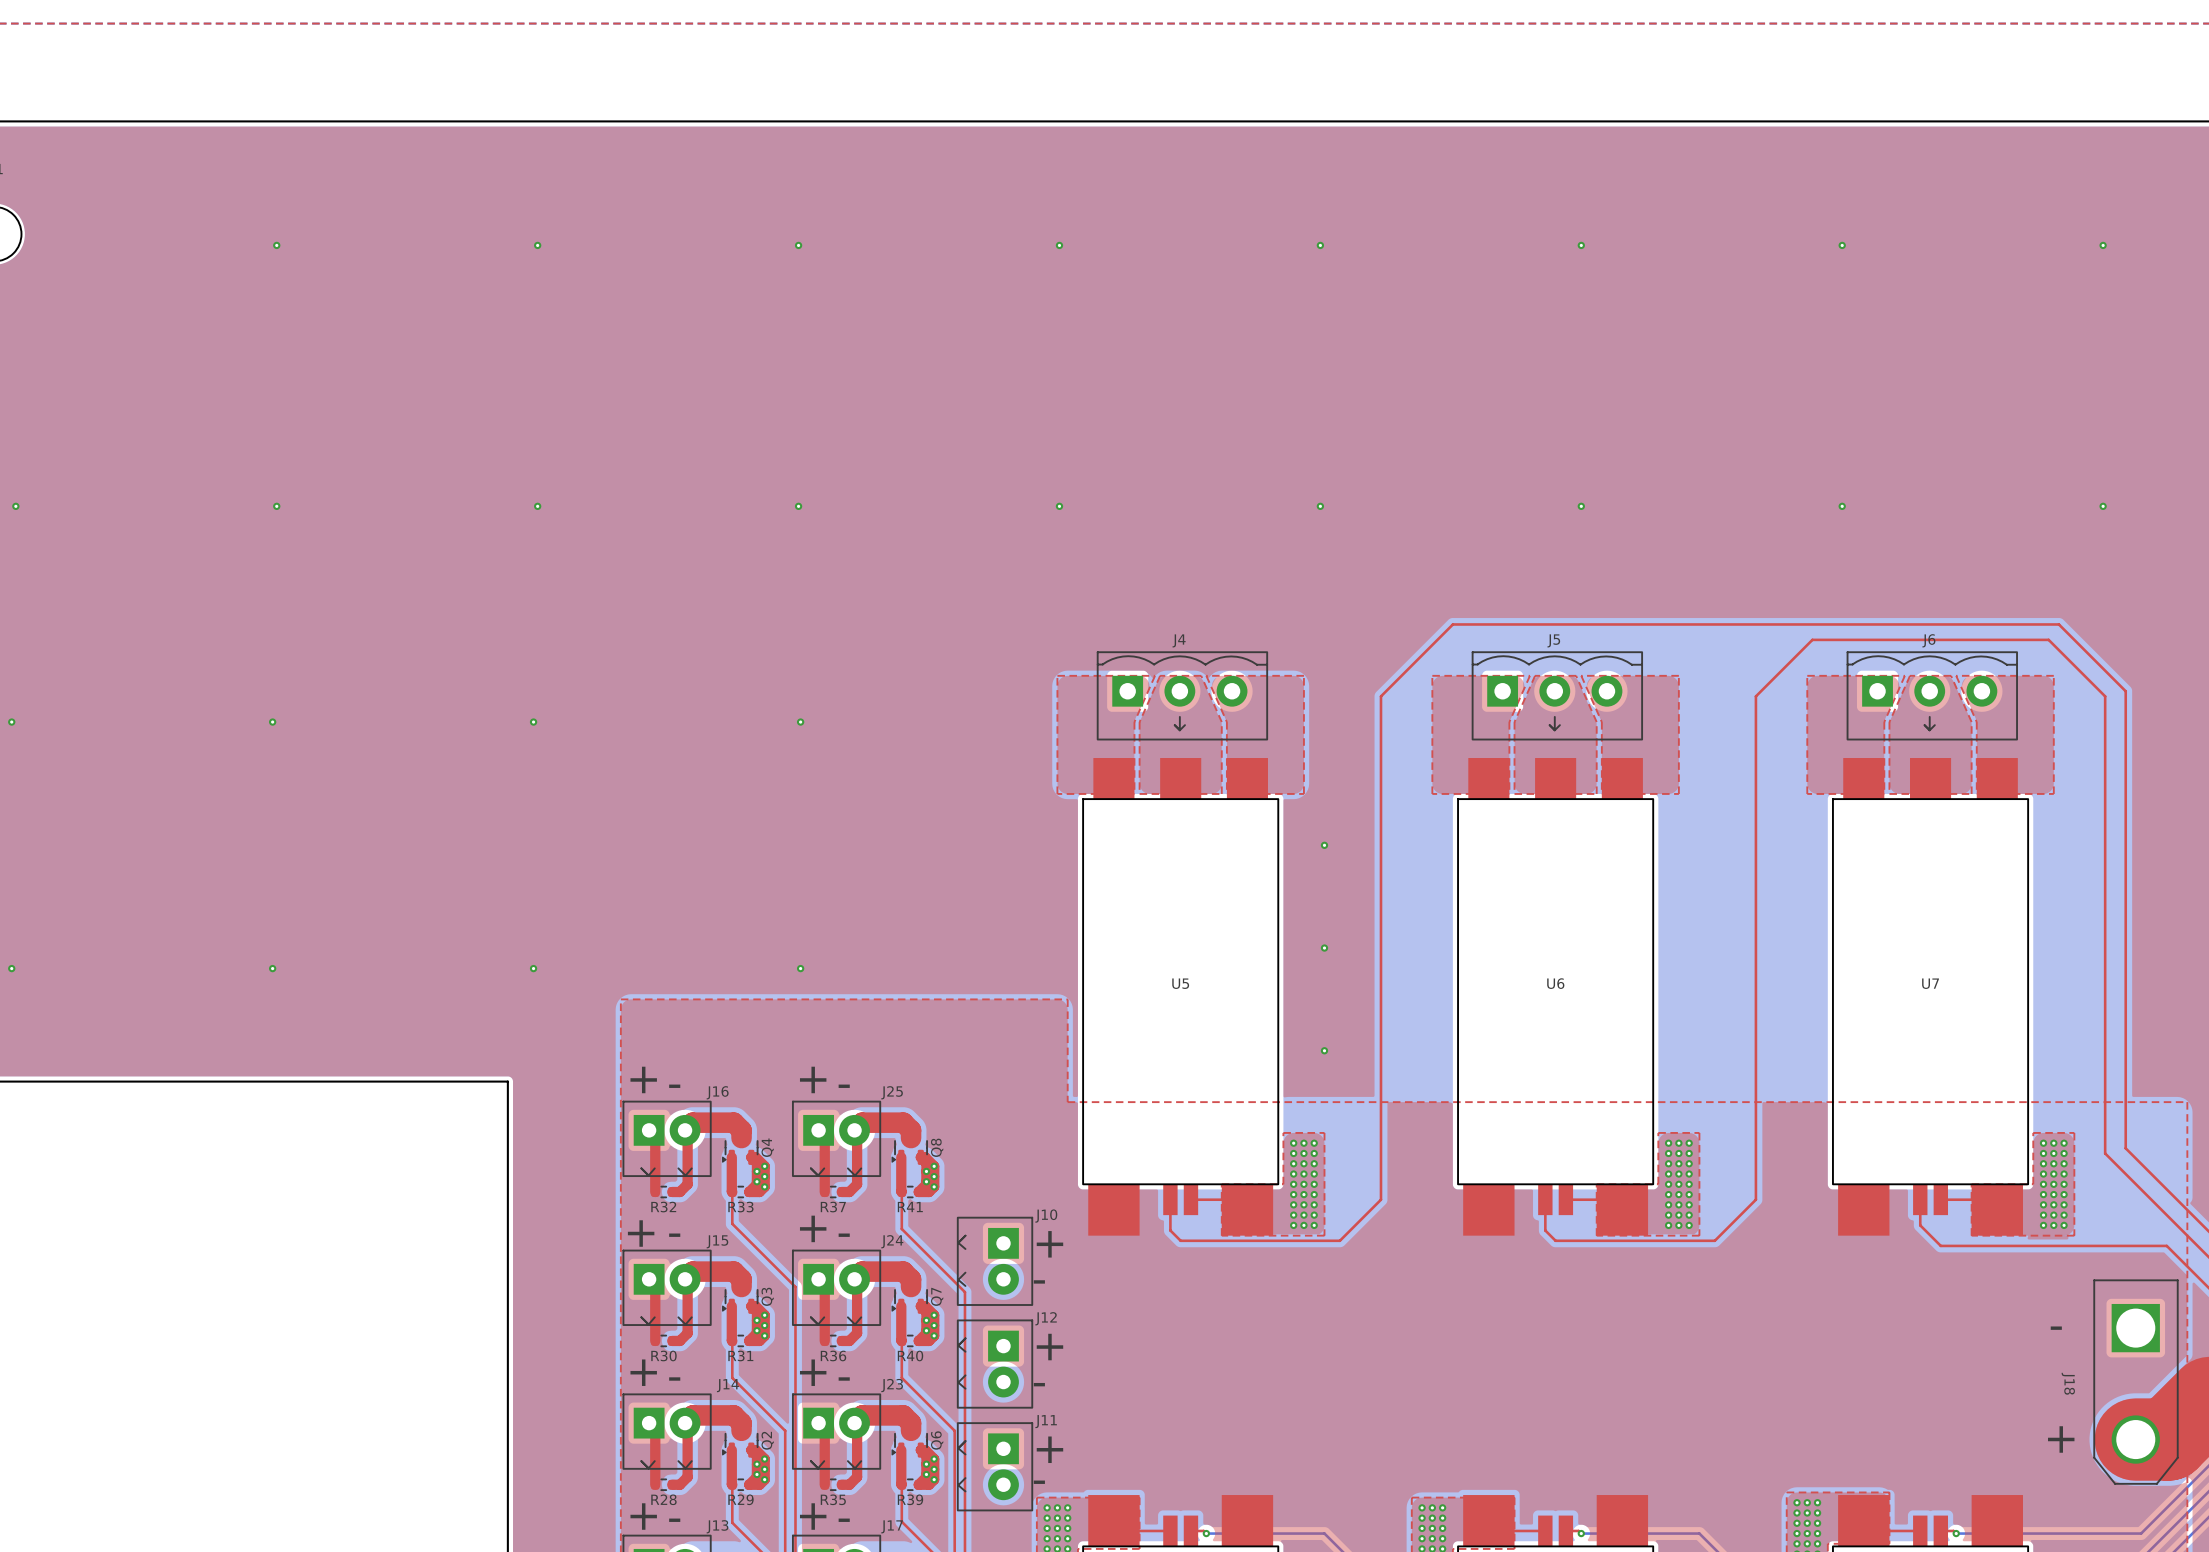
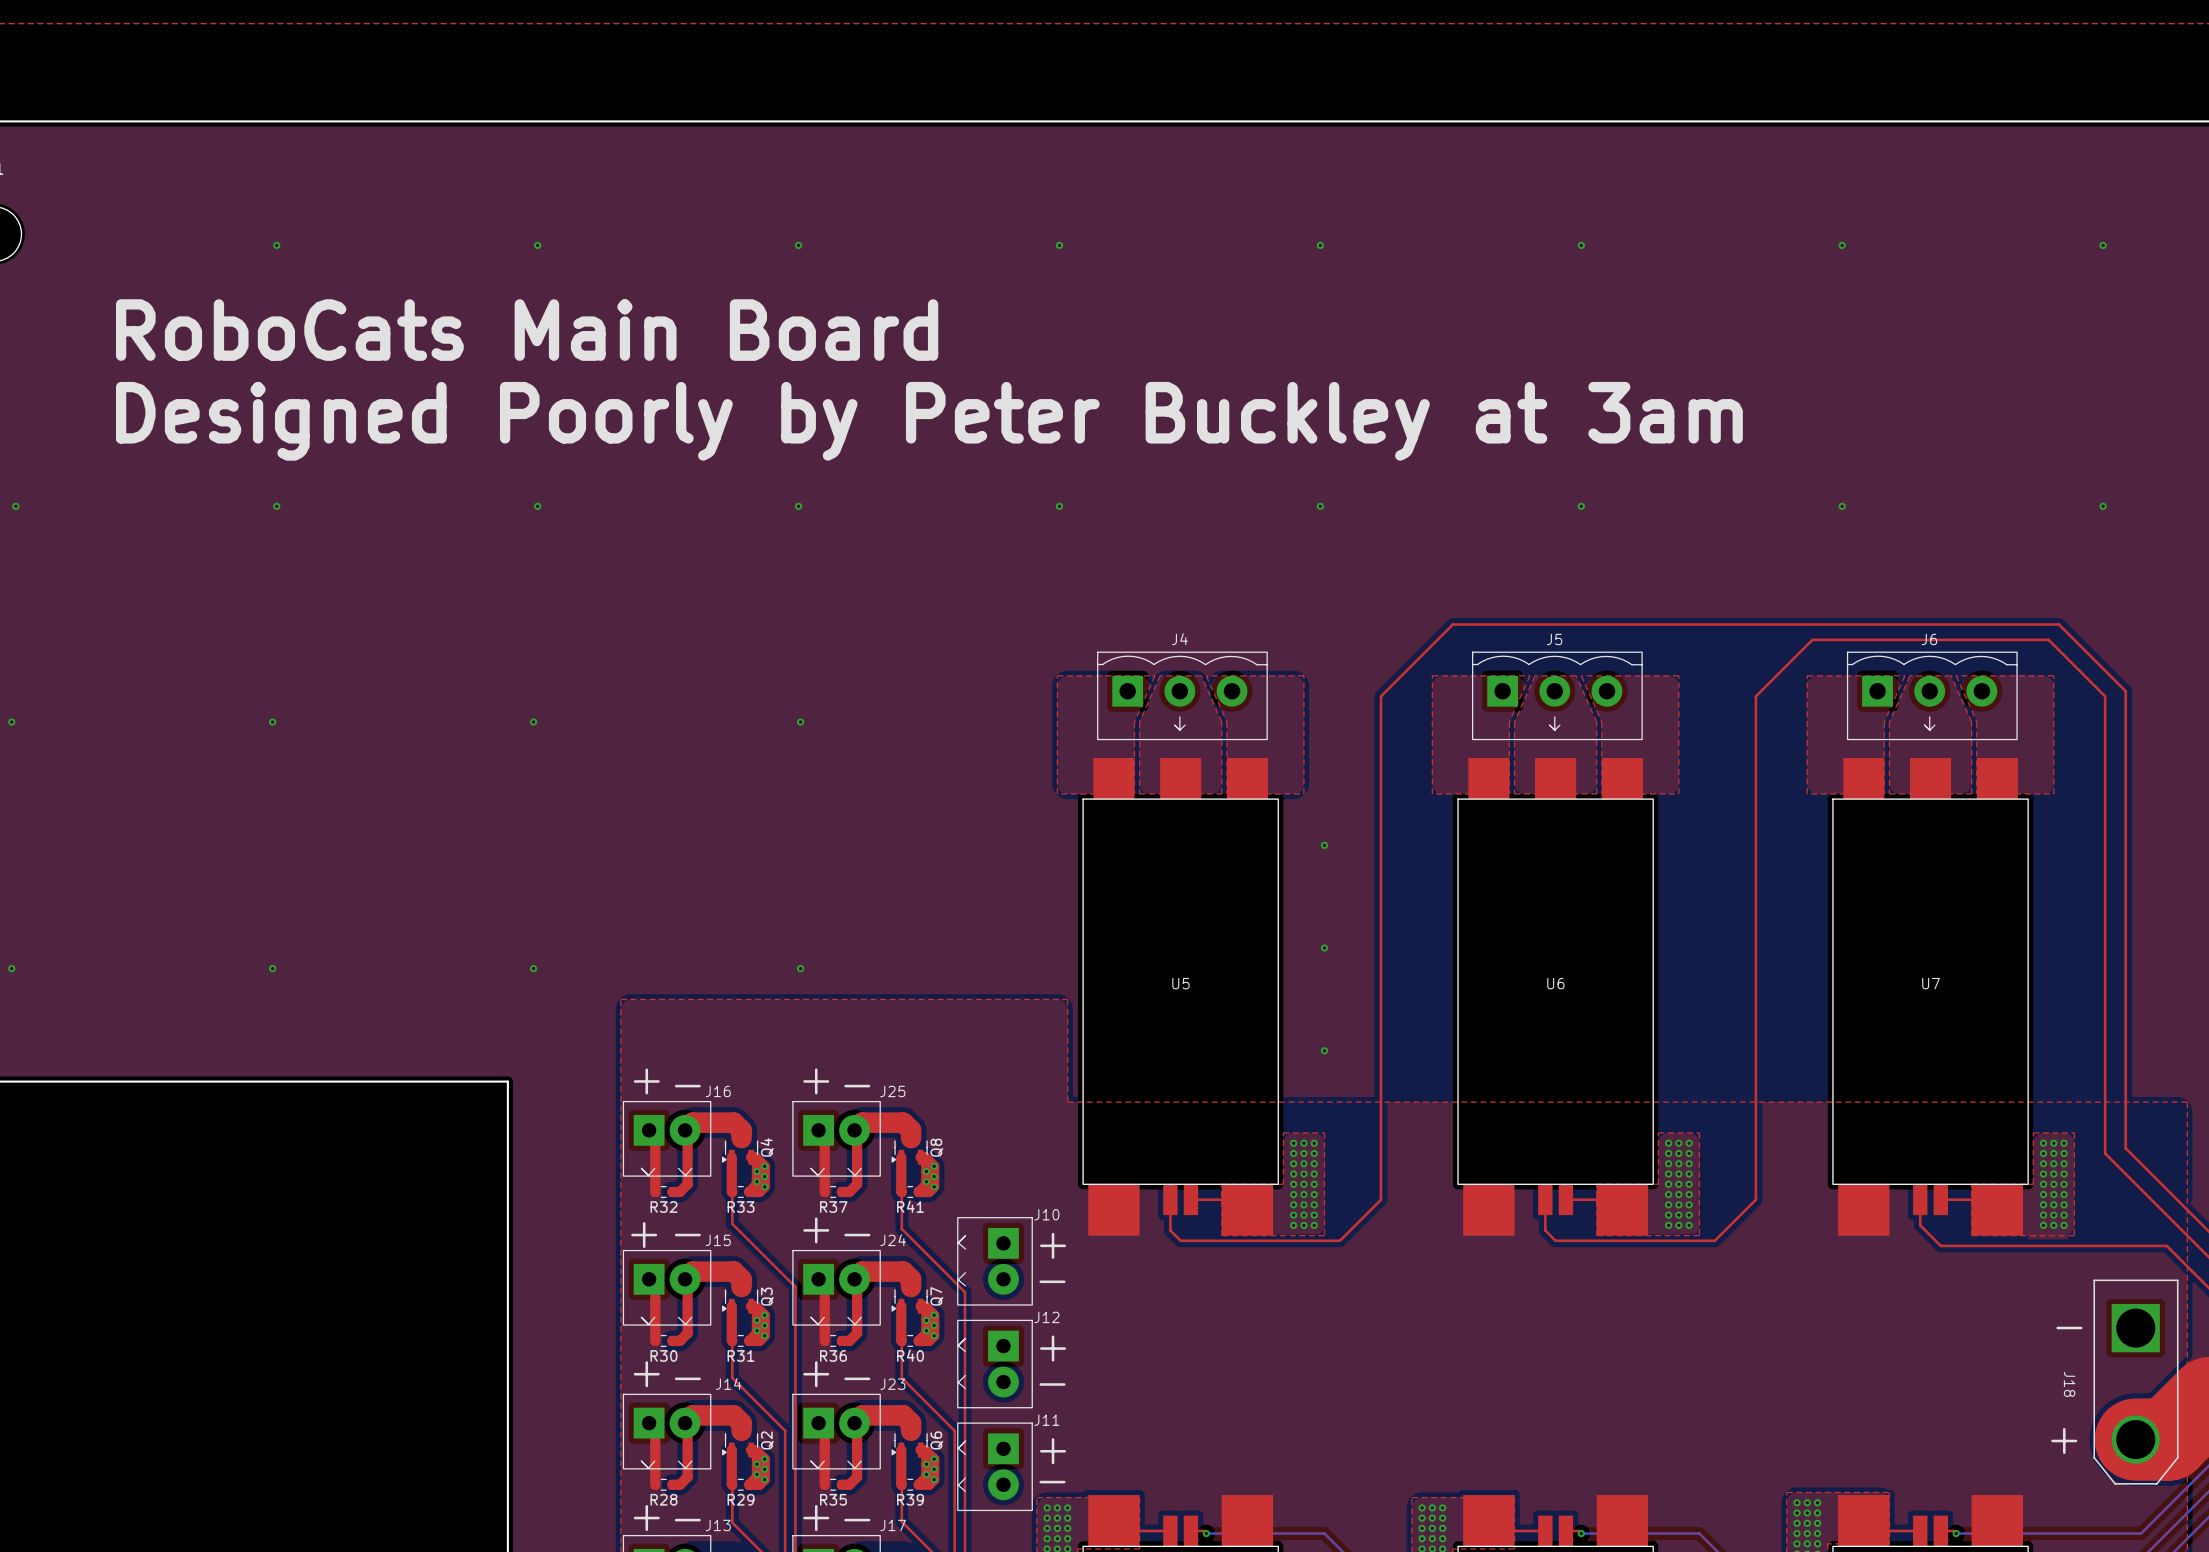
text: none -> RoboCats Main Board (527, 330)
text: none -> Designed Poorly by Peter Buckley at 3am (929, 421)

